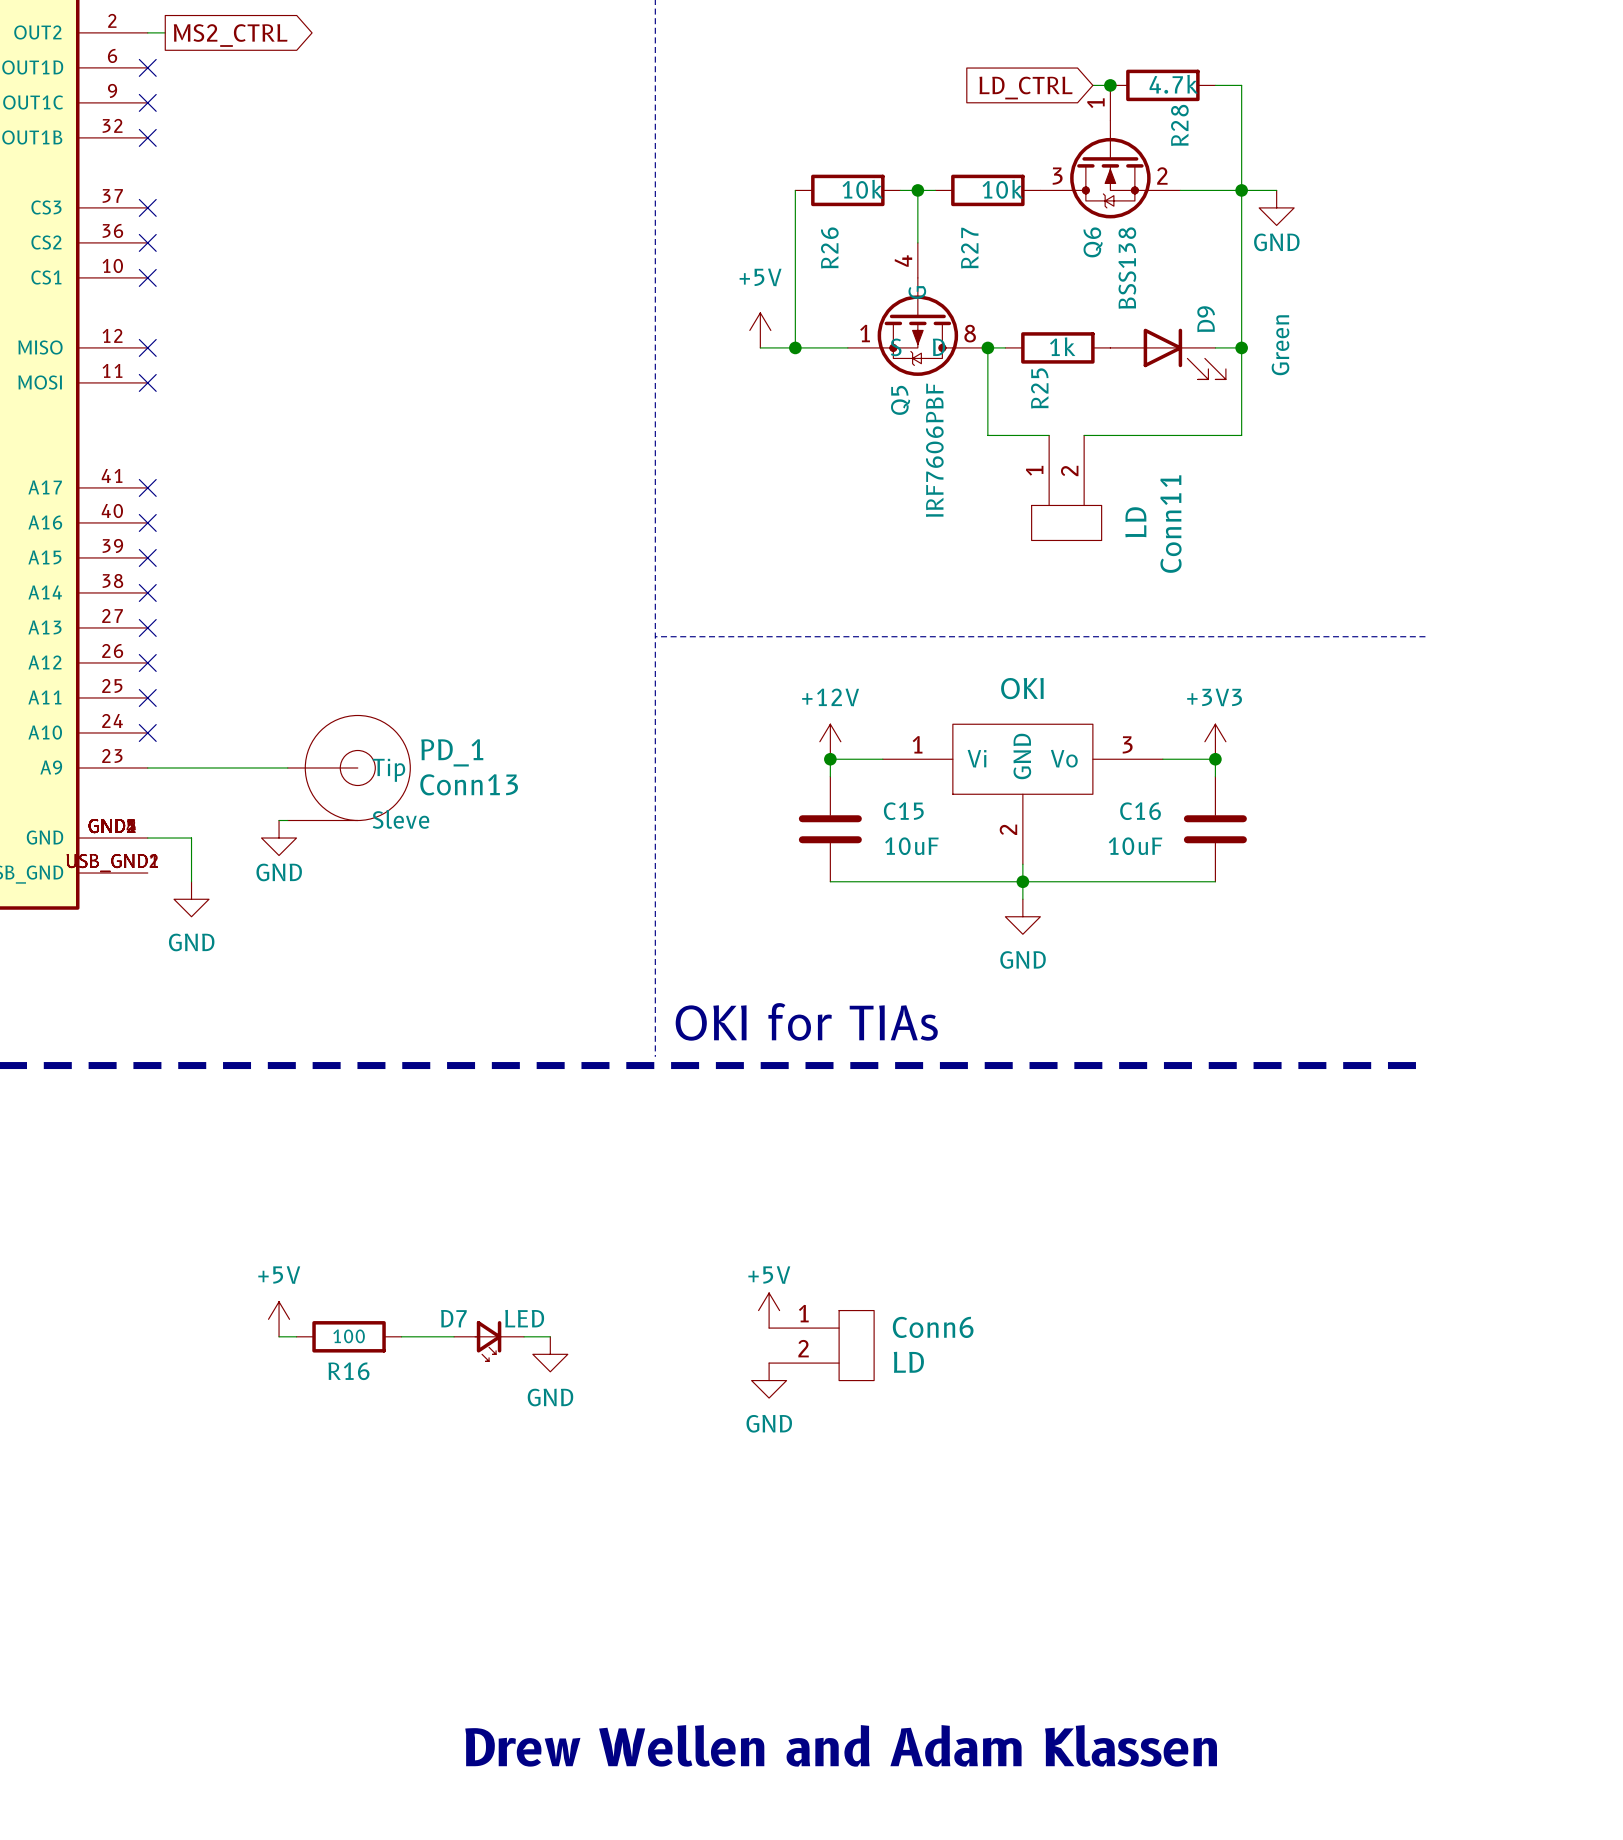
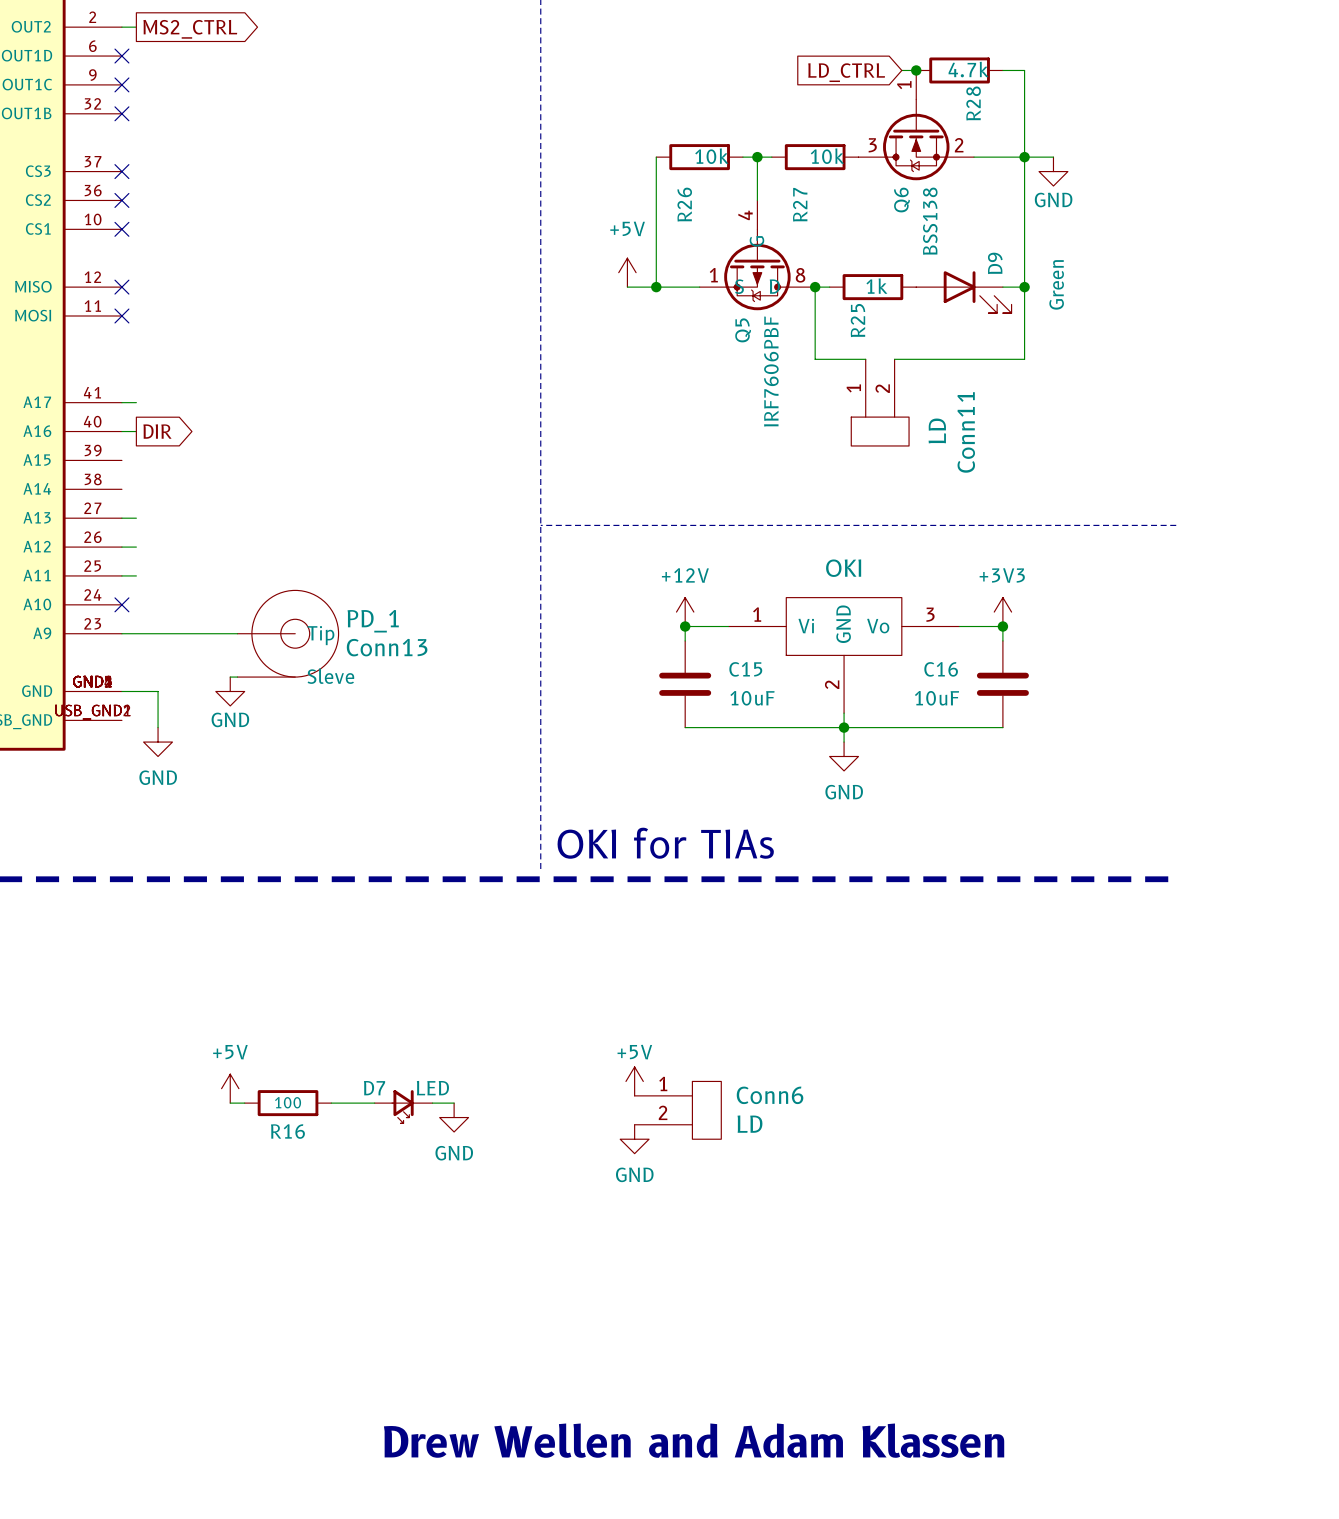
wire: none -> (121, 402) (136, 402)
no-connect mark: (147, 487) -> none
wire: none -> (121, 431) (136, 431)
no-connect mark: (147, 522) -> none
global label: none -> DIR (157, 431)
no-connect mark: (147, 557) -> none
no-connect mark: (147, 592) -> none
wire: none -> (121, 518) (136, 518)
no-connect mark: (147, 627) -> none
wire: none -> (121, 547) (136, 547)
no-connect mark: (147, 662) -> none
wire: none -> (121, 575) (136, 575)
no-connect mark: (147, 697) -> none

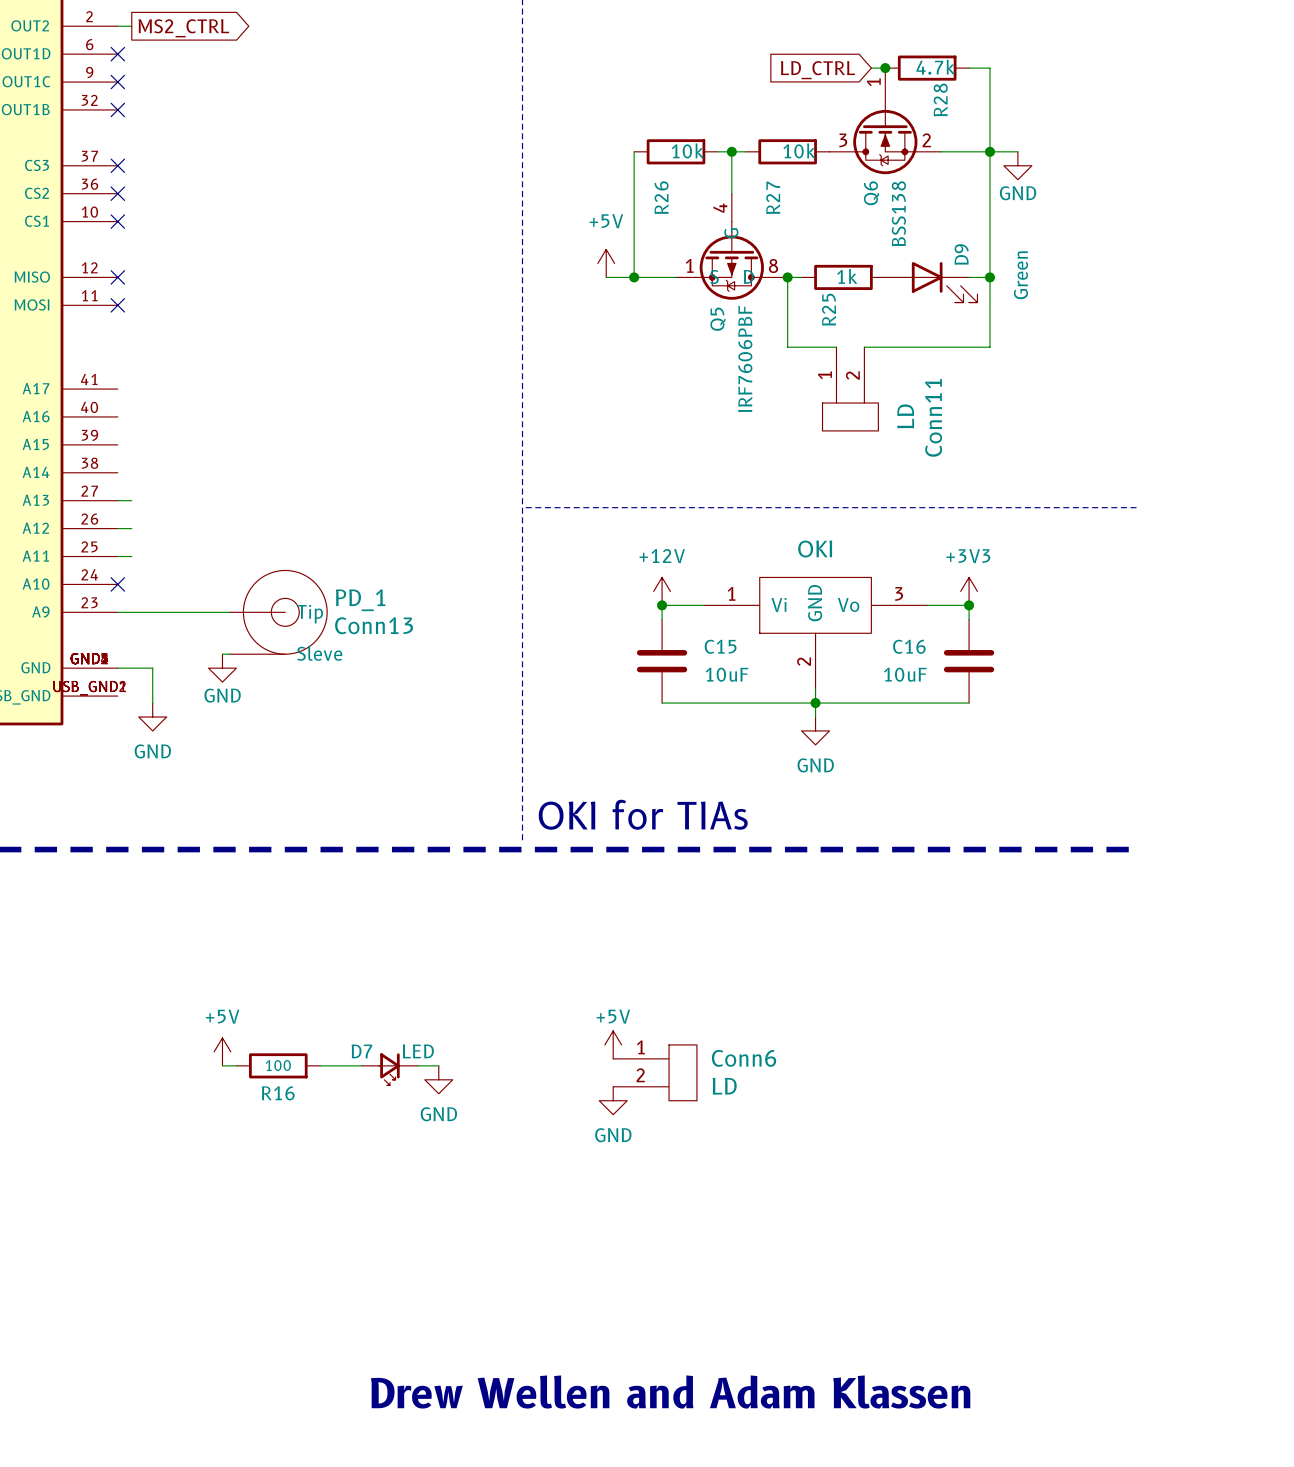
wire: (121, 402) (136, 402) -> none
wire: (121, 431) (136, 431) -> none
global label: DIR (157, 431) -> none

